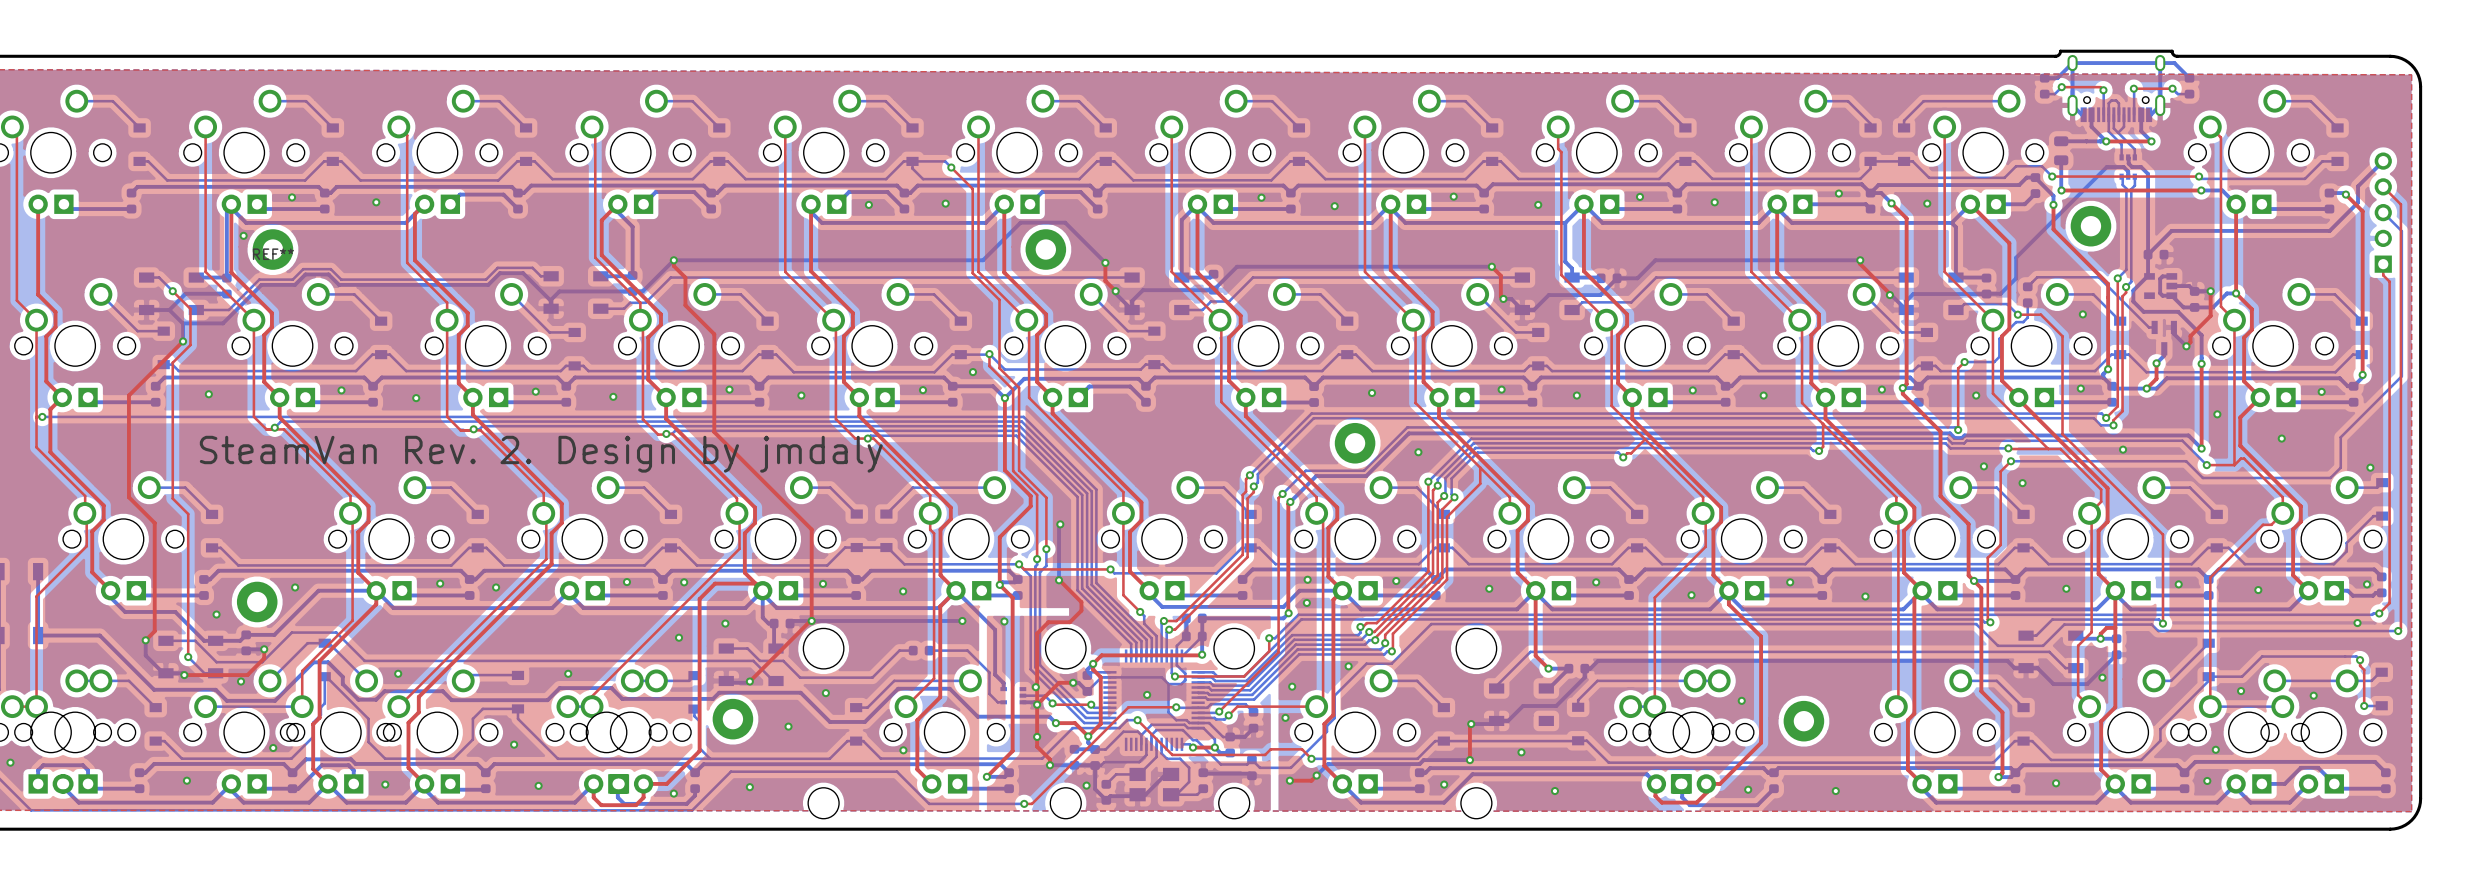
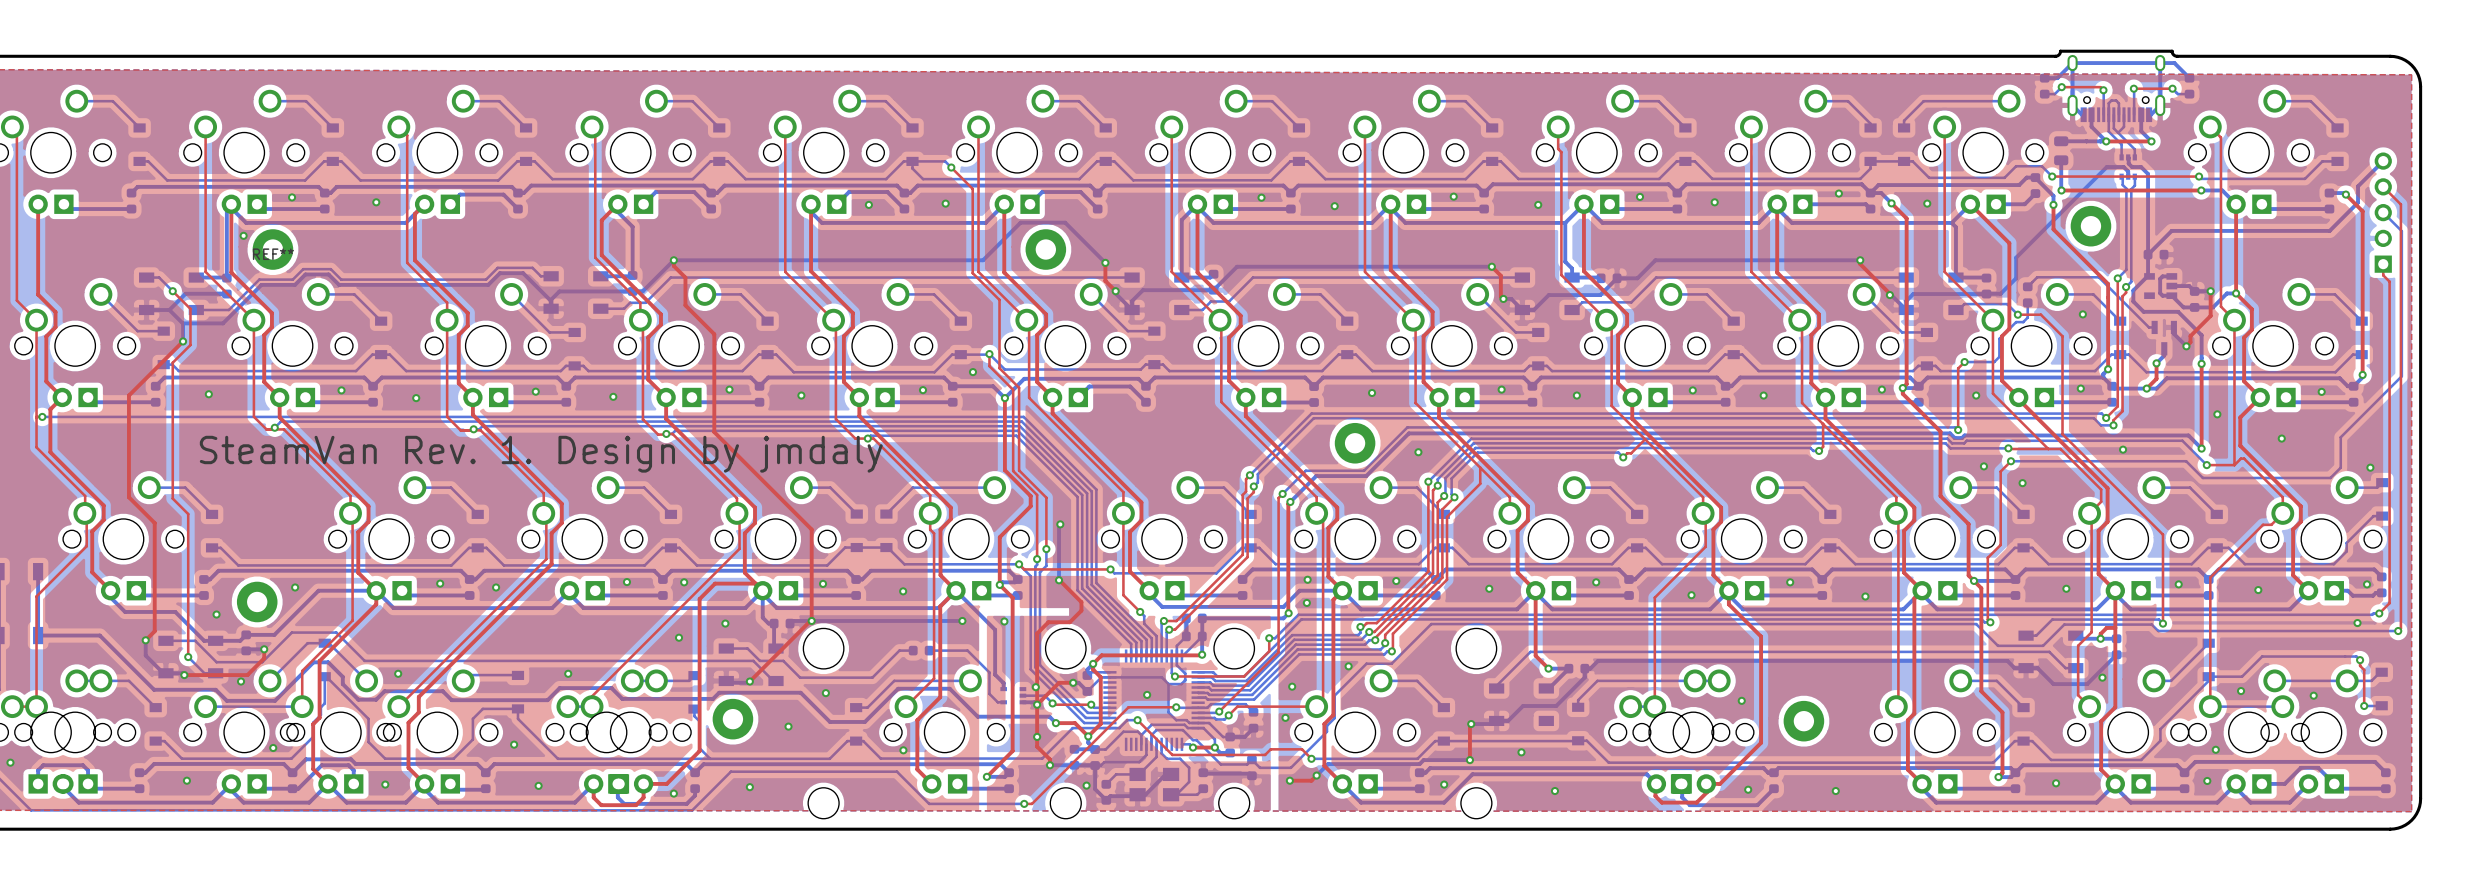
text: SteamVan Rev. 2. Design by jmdaly (541, 454) -> SteamVan Rev. 1. Design by jmdaly (541, 454)

